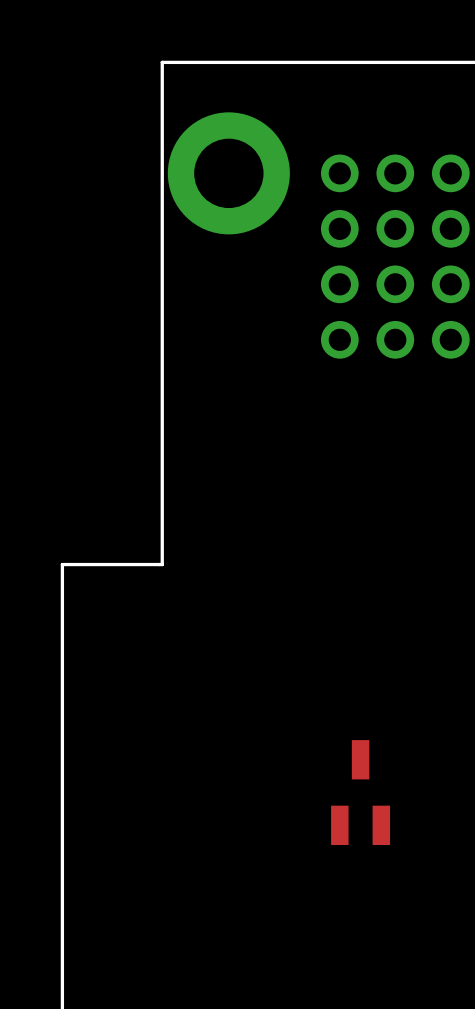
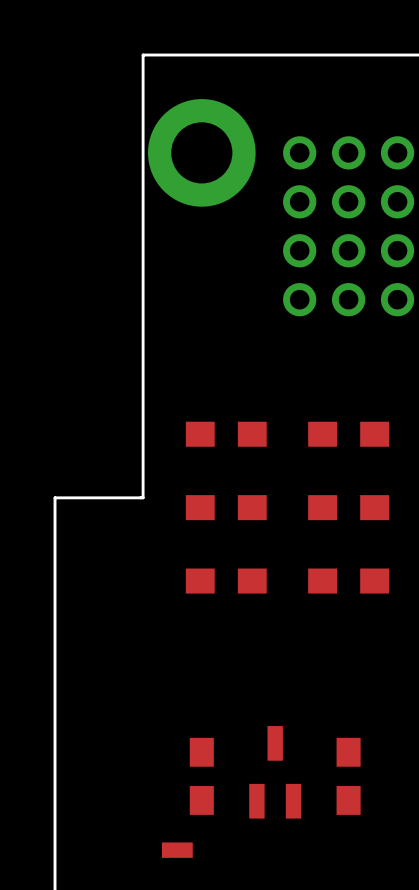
part: none -> (226, 434)
part: none -> (348, 434)
part: none -> (226, 507)
part: none -> (348, 507)
part: none -> (226, 581)
part: none -> (348, 581)
part position: (360, 792) -> (275, 772)
part: none -> (201, 776)
part: none -> (348, 776)
part: none -> (177, 850)

